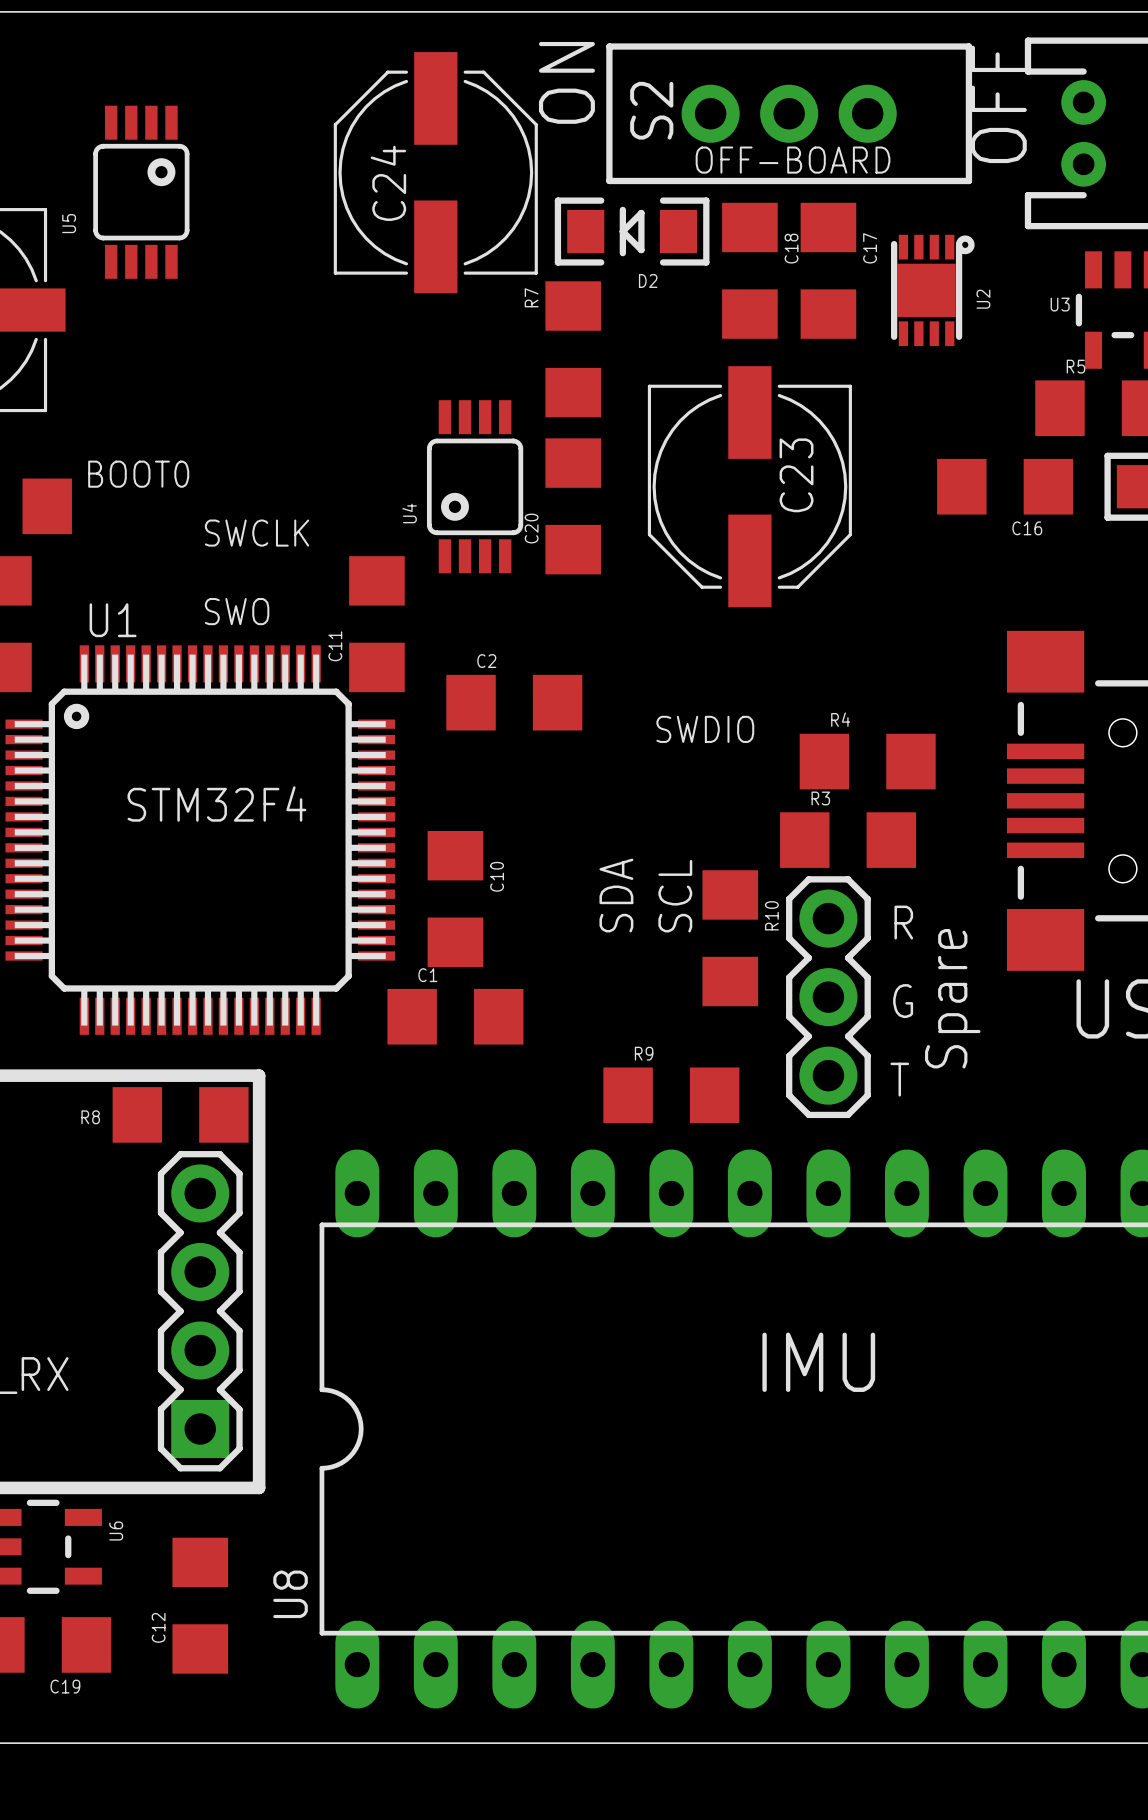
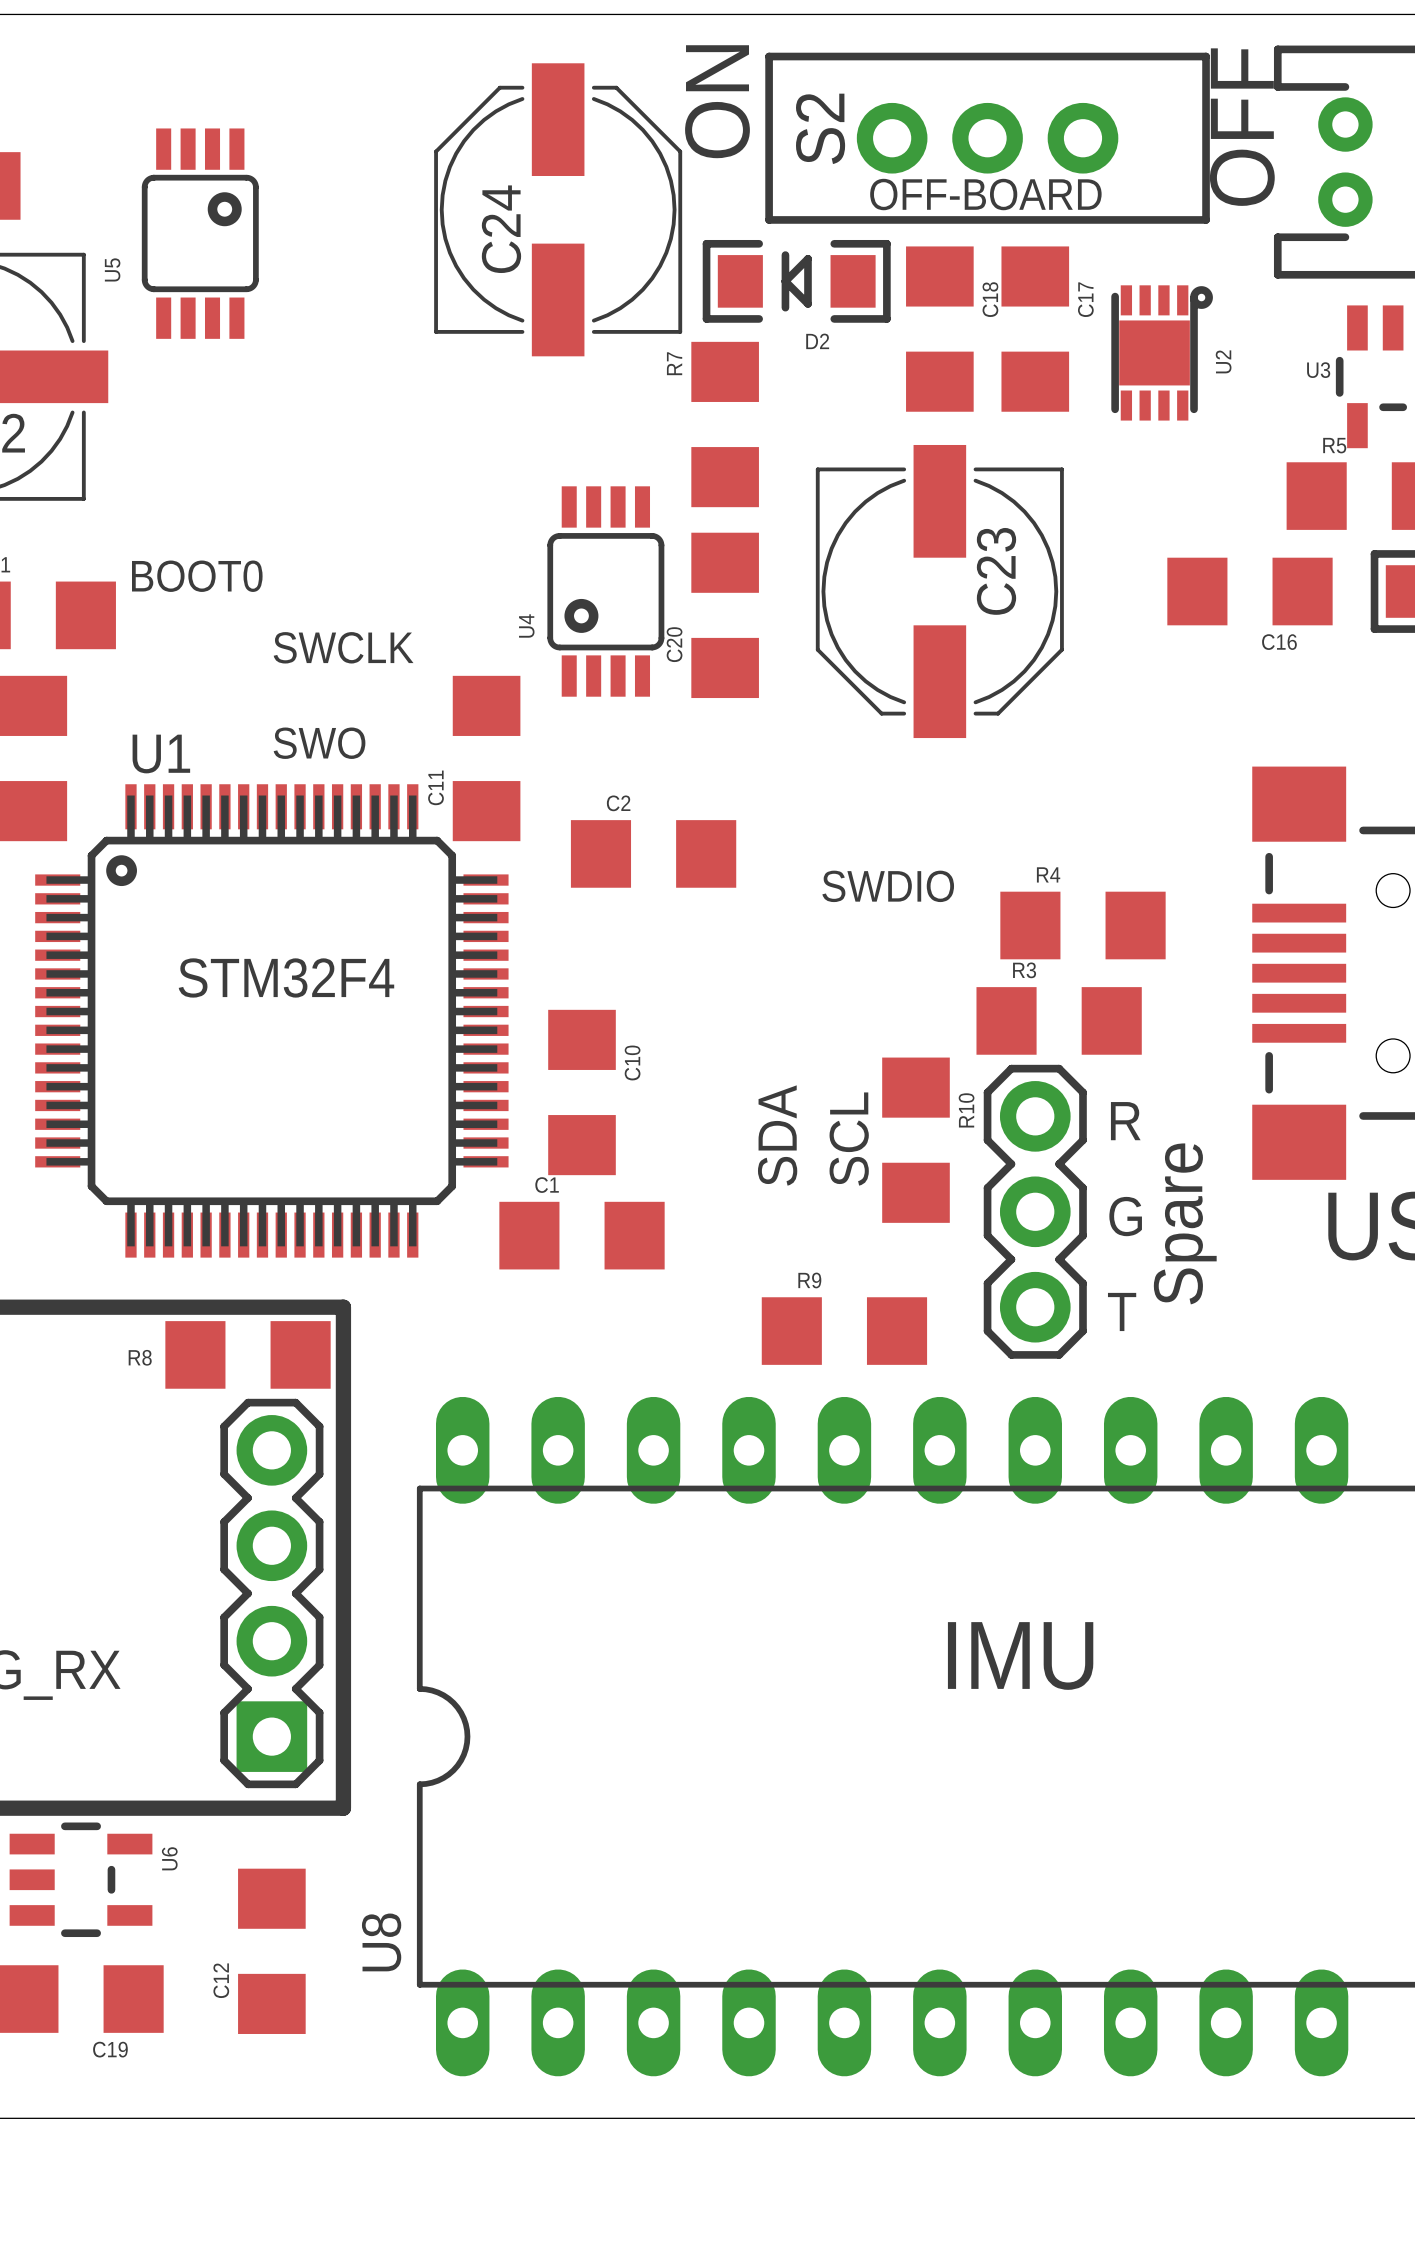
text position: SDA (616, 895) -> SDA (777, 1135)
text position: SCL (675, 896) -> SCL (849, 1139)

